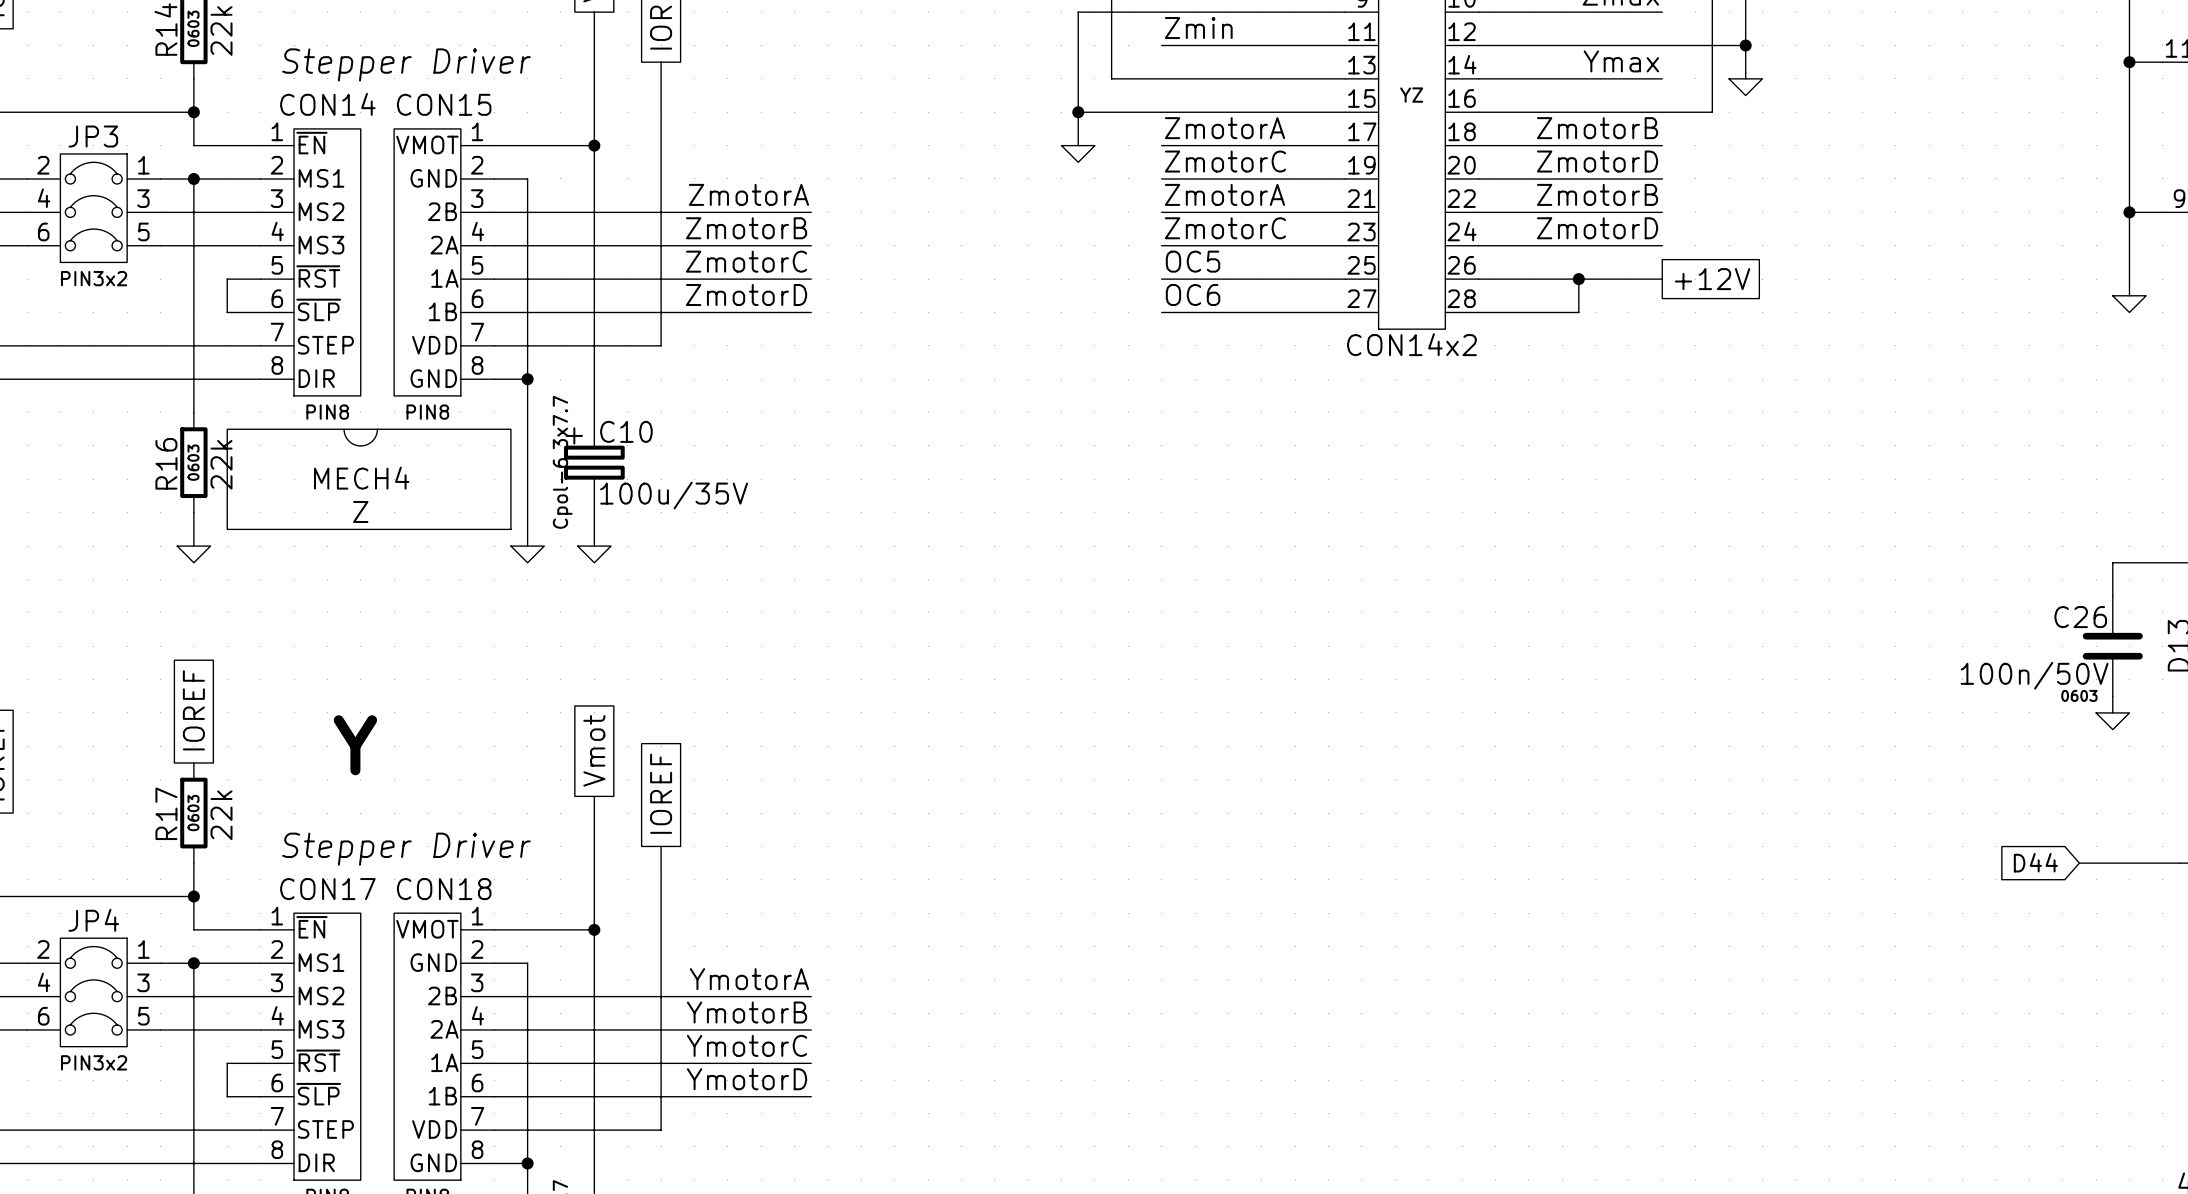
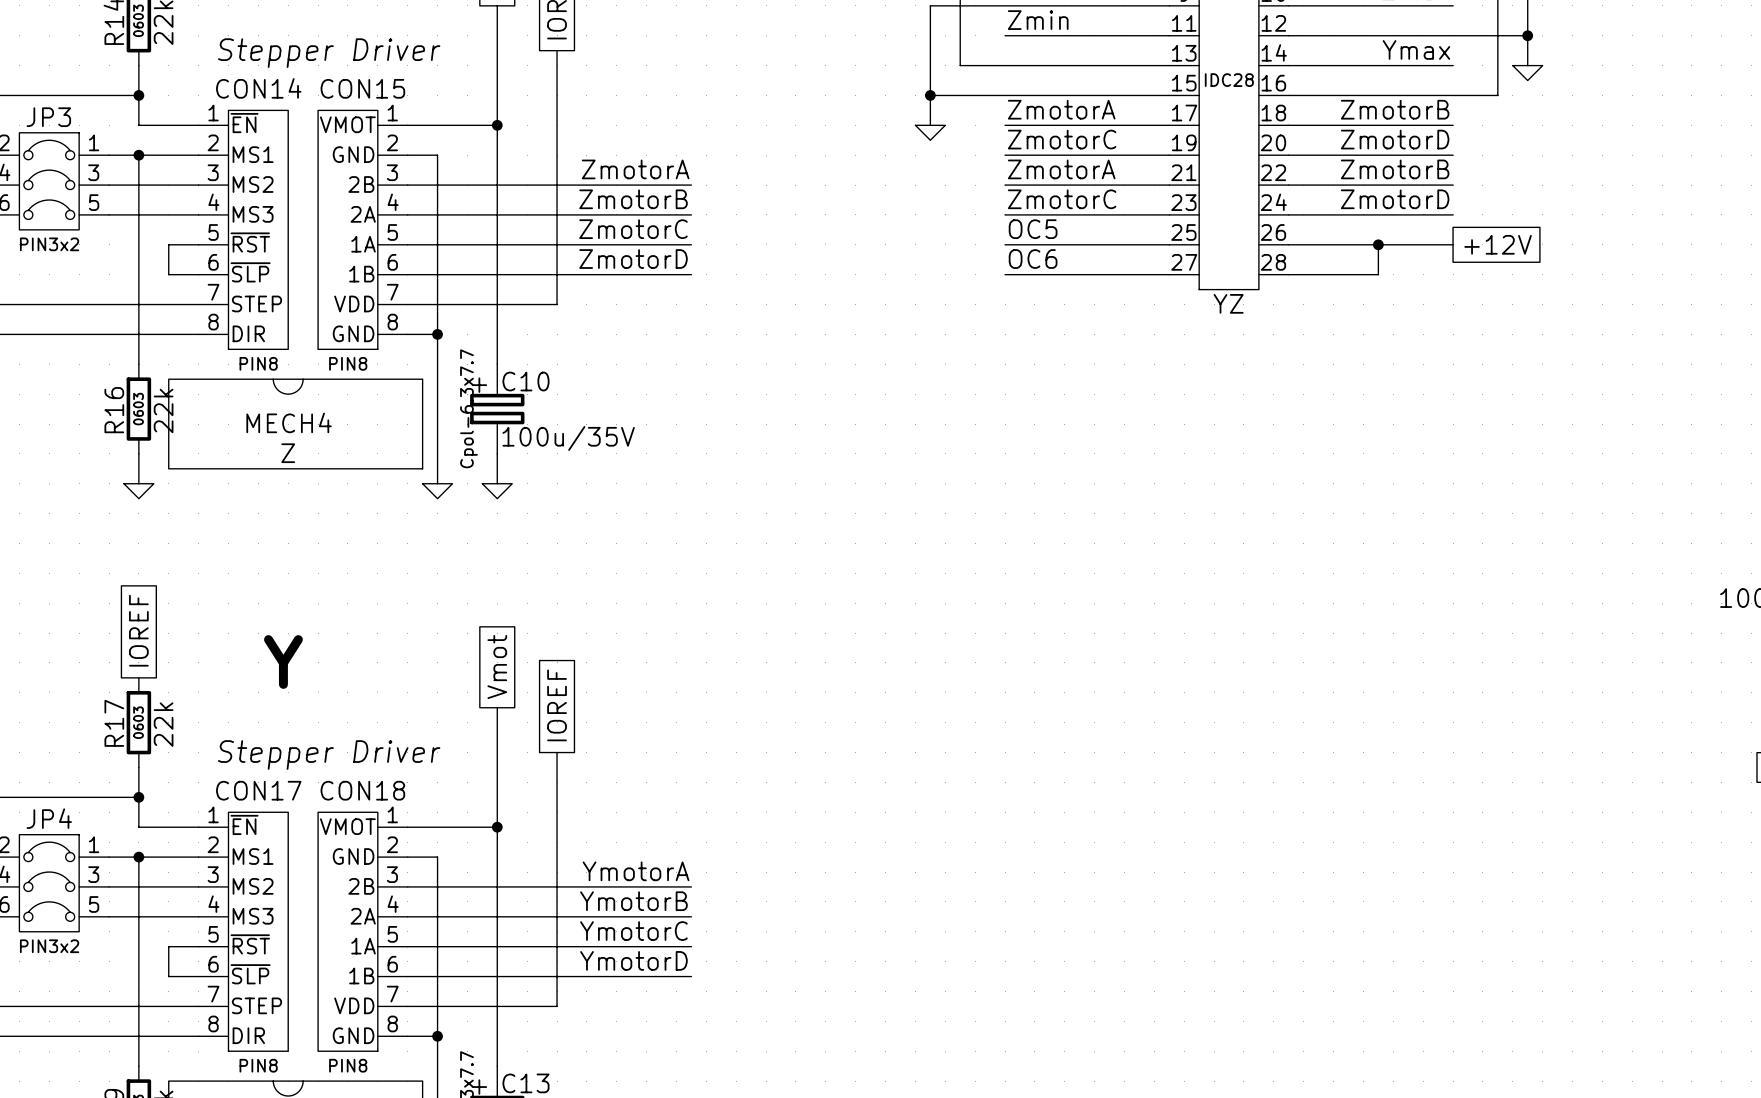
part text: YZ (1411, 95) -> IDC28 (1229, 80)
part value: CON14x2 (1411, 344) -> YZ (1228, 303)

